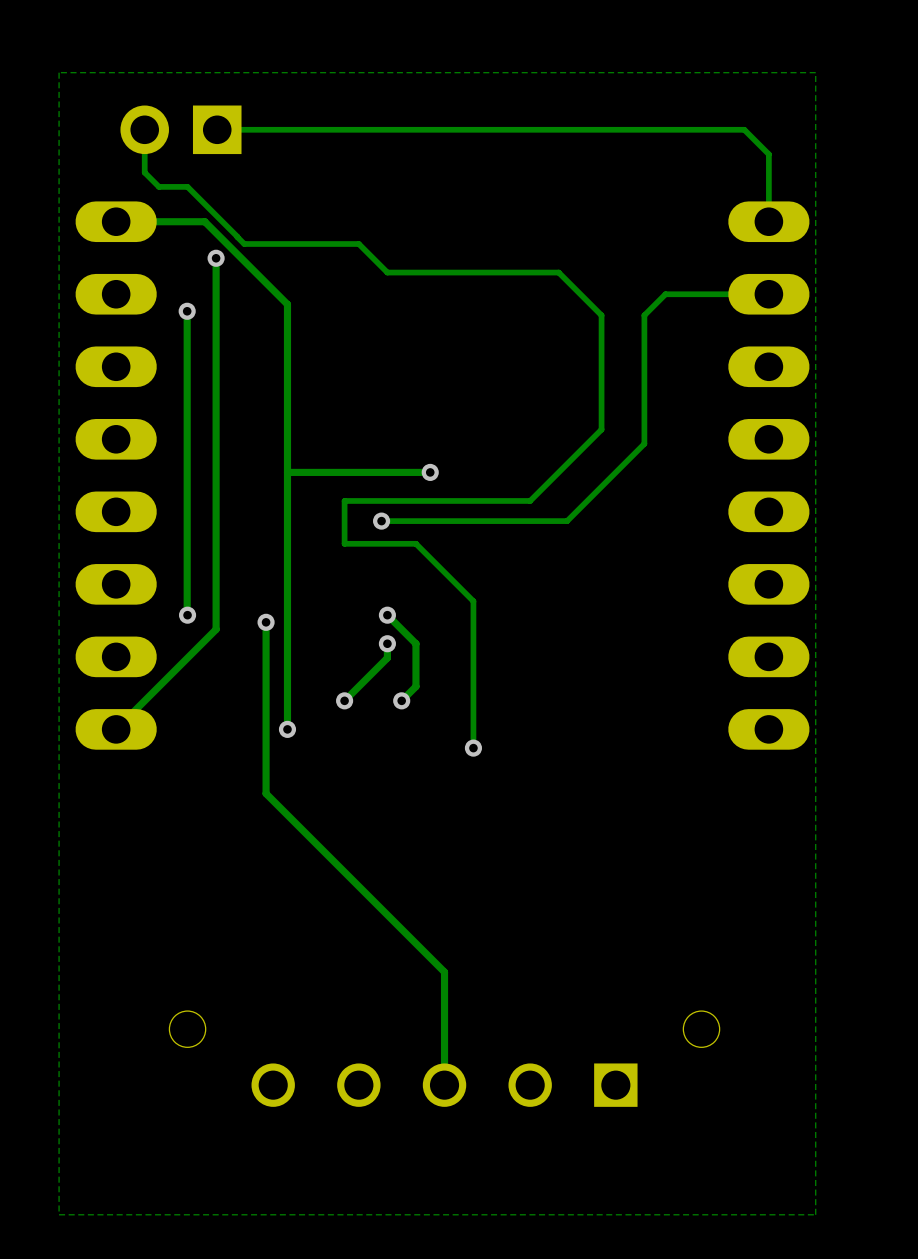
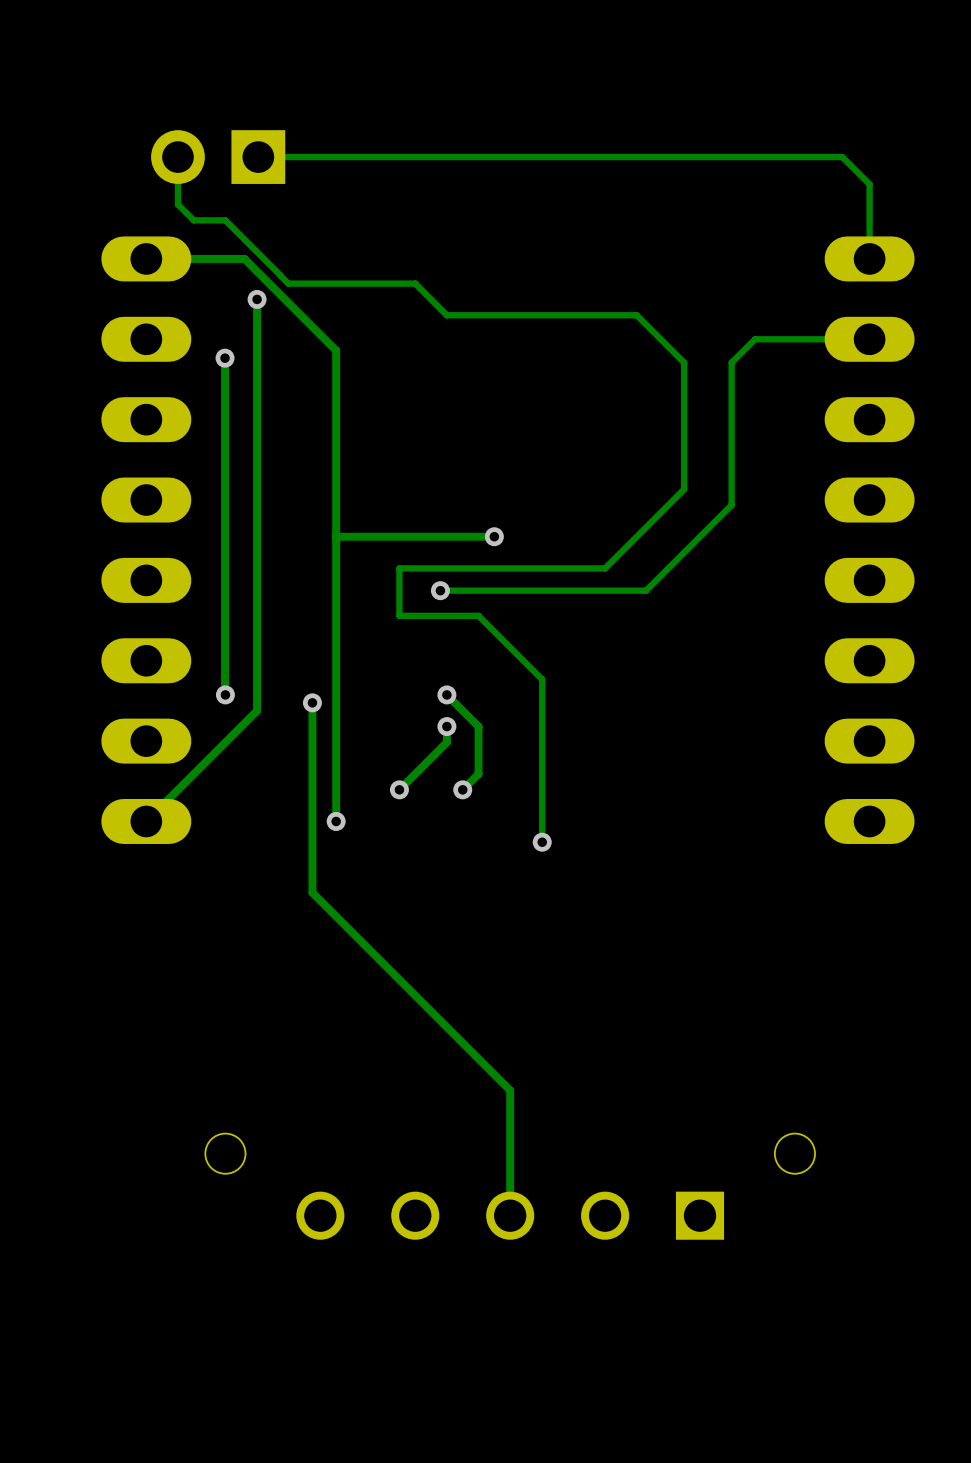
zone outline: (815, 72) (59, 72) (59, 1214) (815, 1214) (815, 72) -> none

